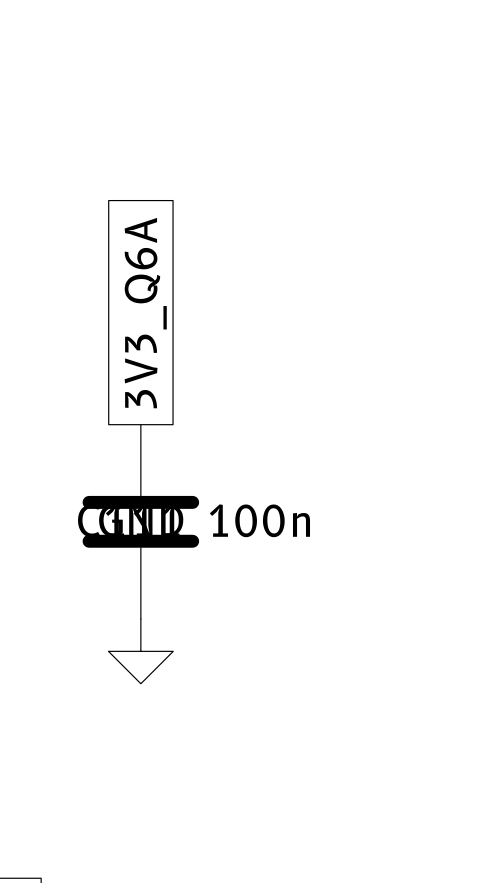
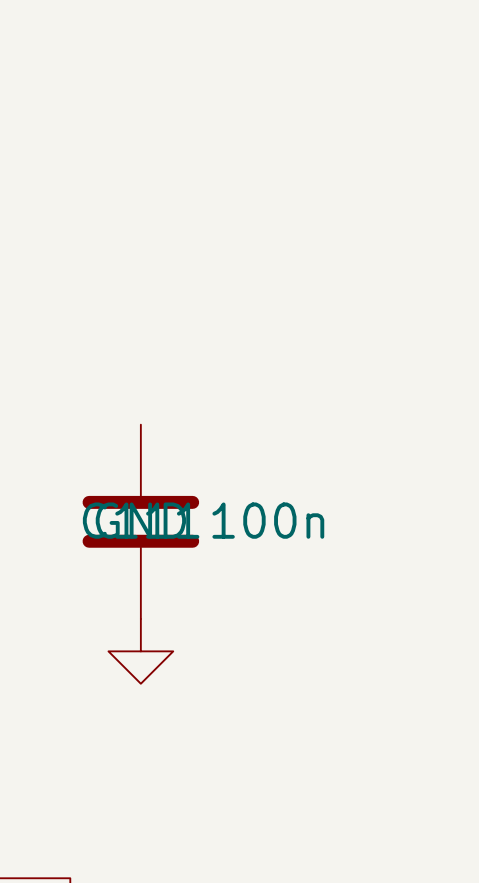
global label: 3V3_Q6A (145, 313) -> none

